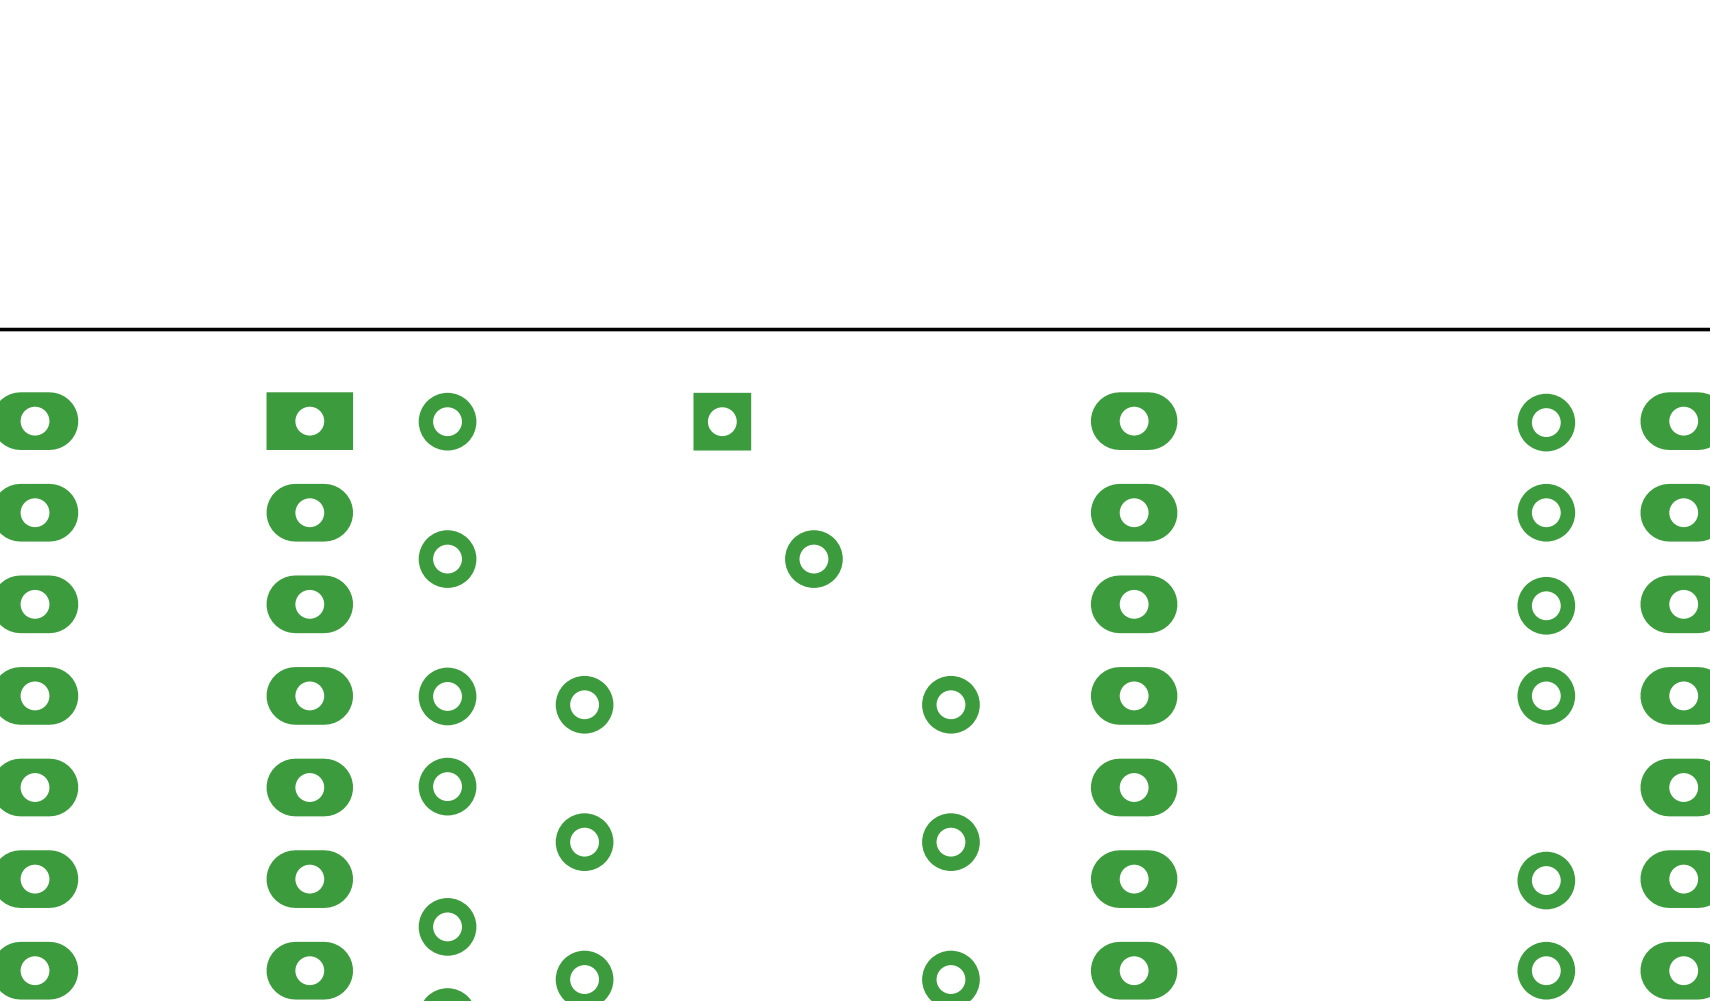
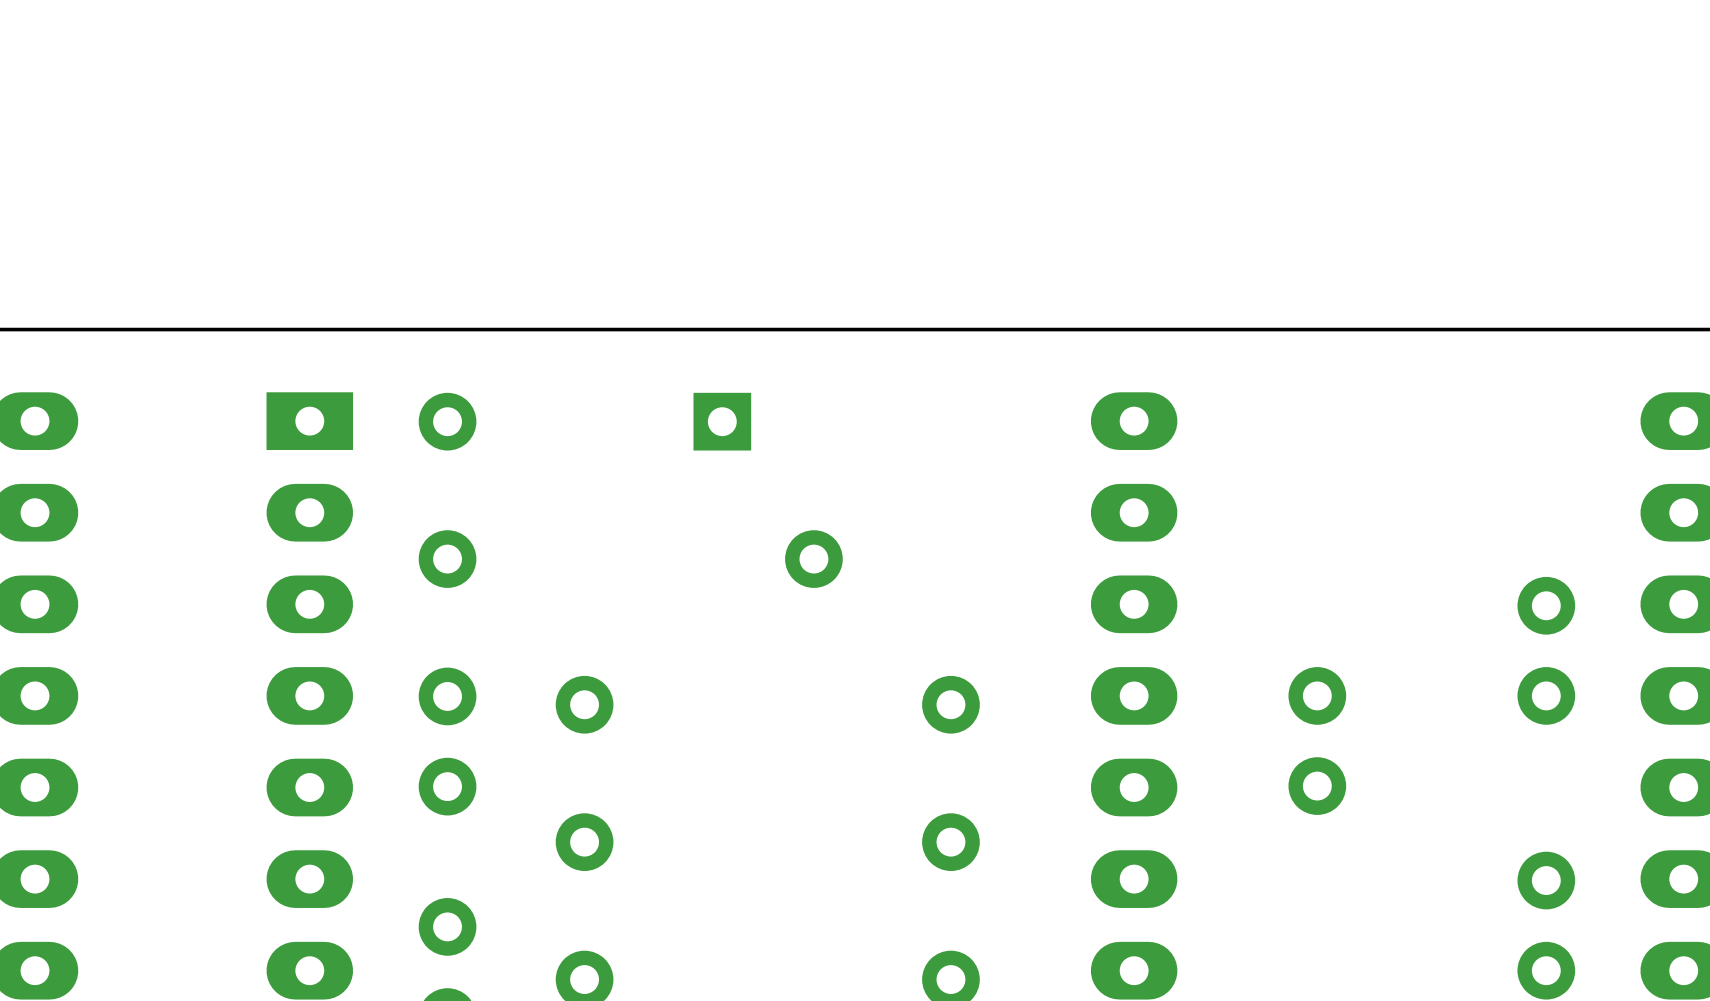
part position: (1546, 467) -> (1317, 740)

